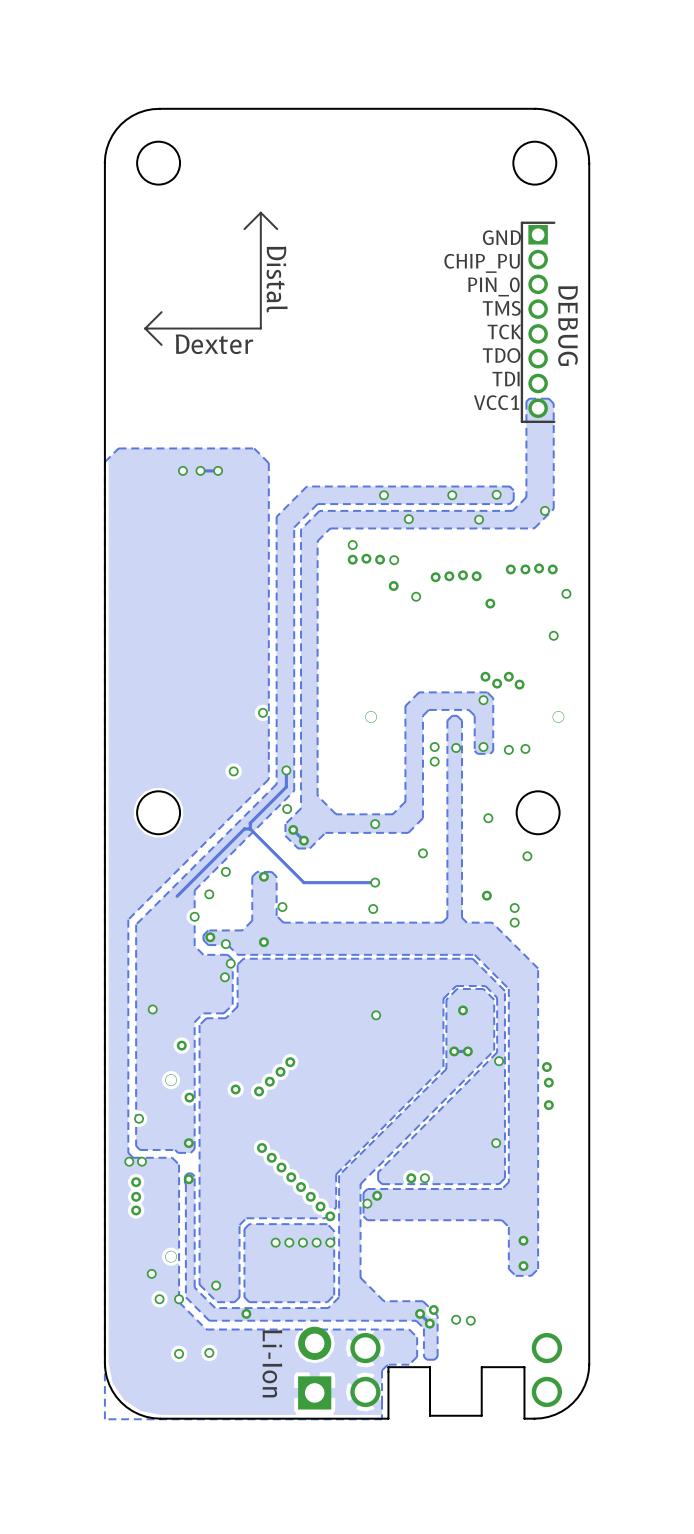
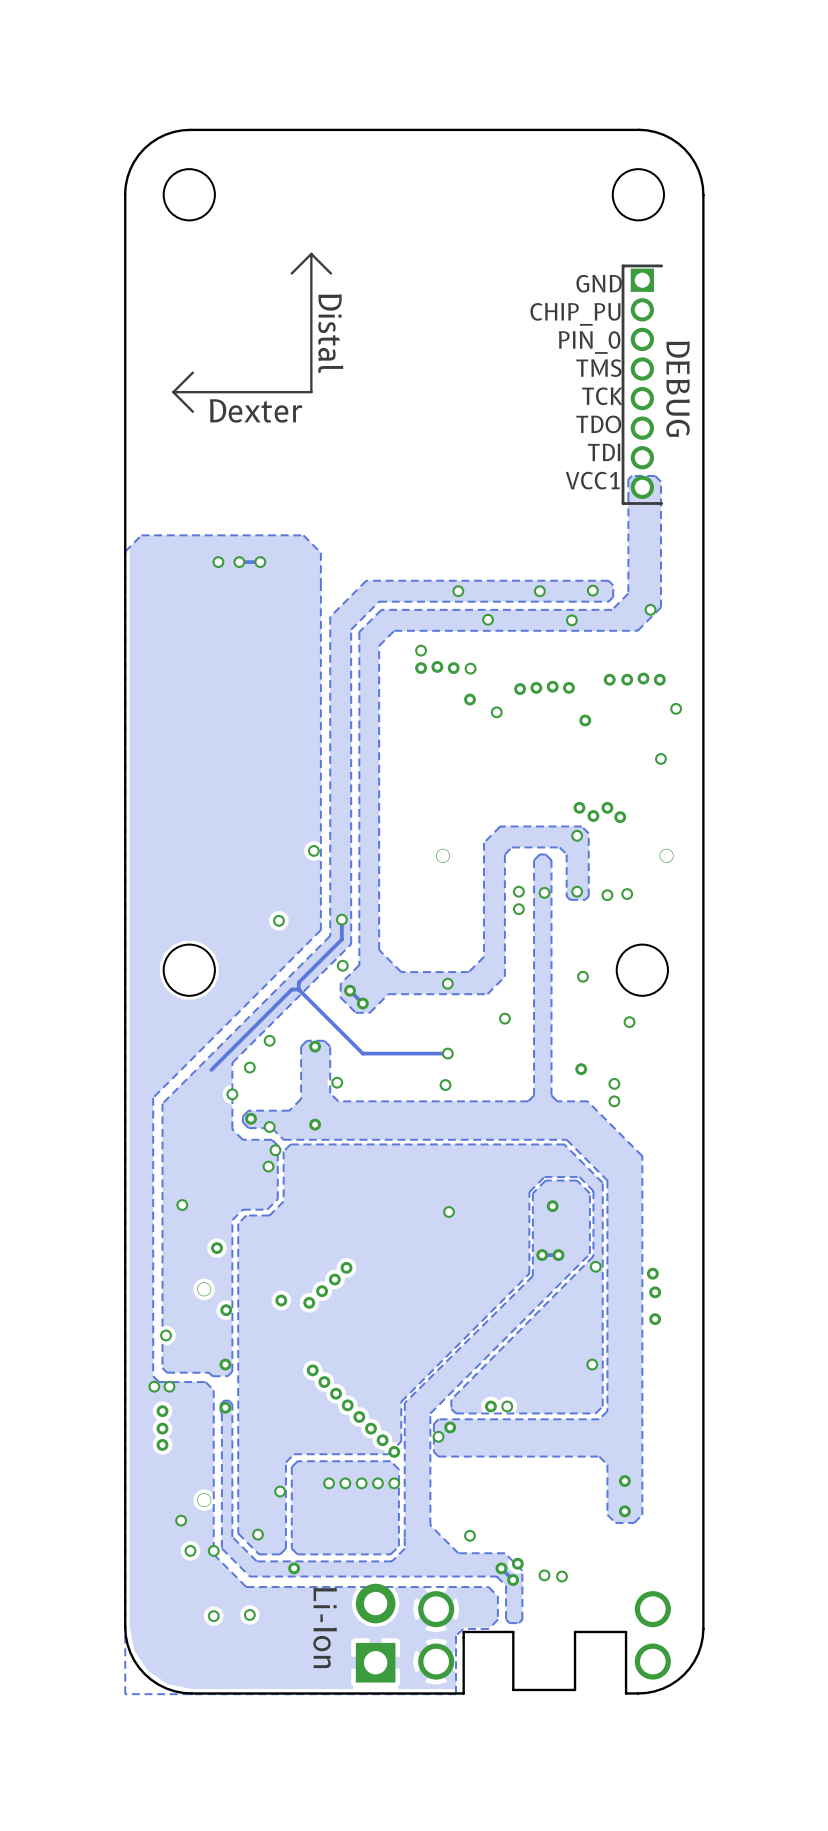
via: none -> (280, 1491)
via: none -> (469, 1535)

